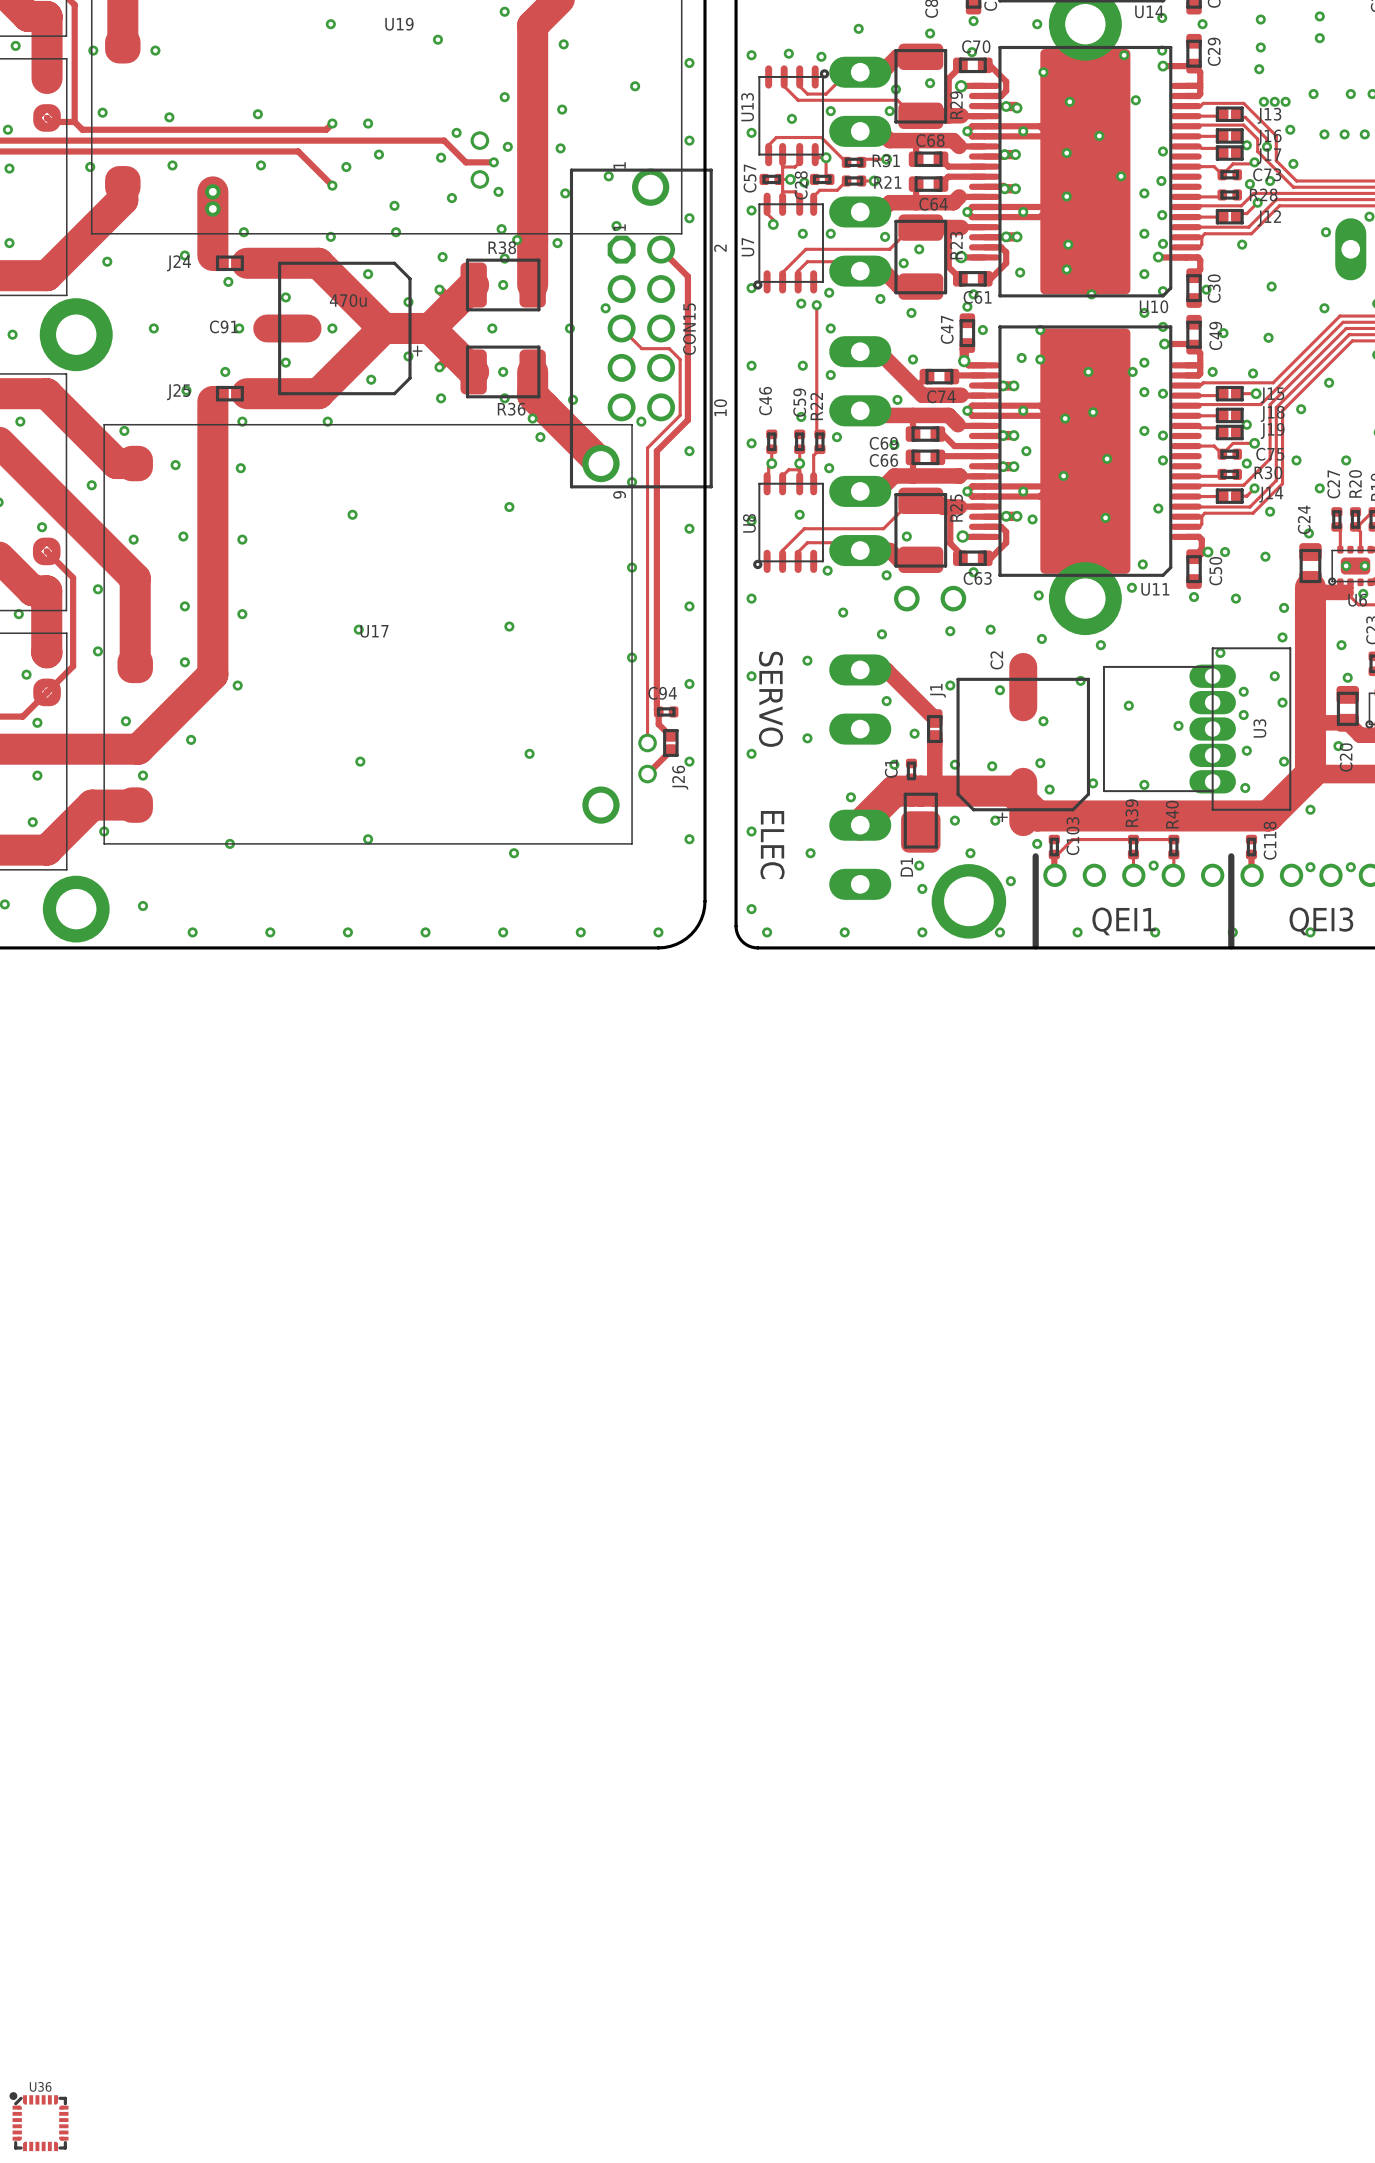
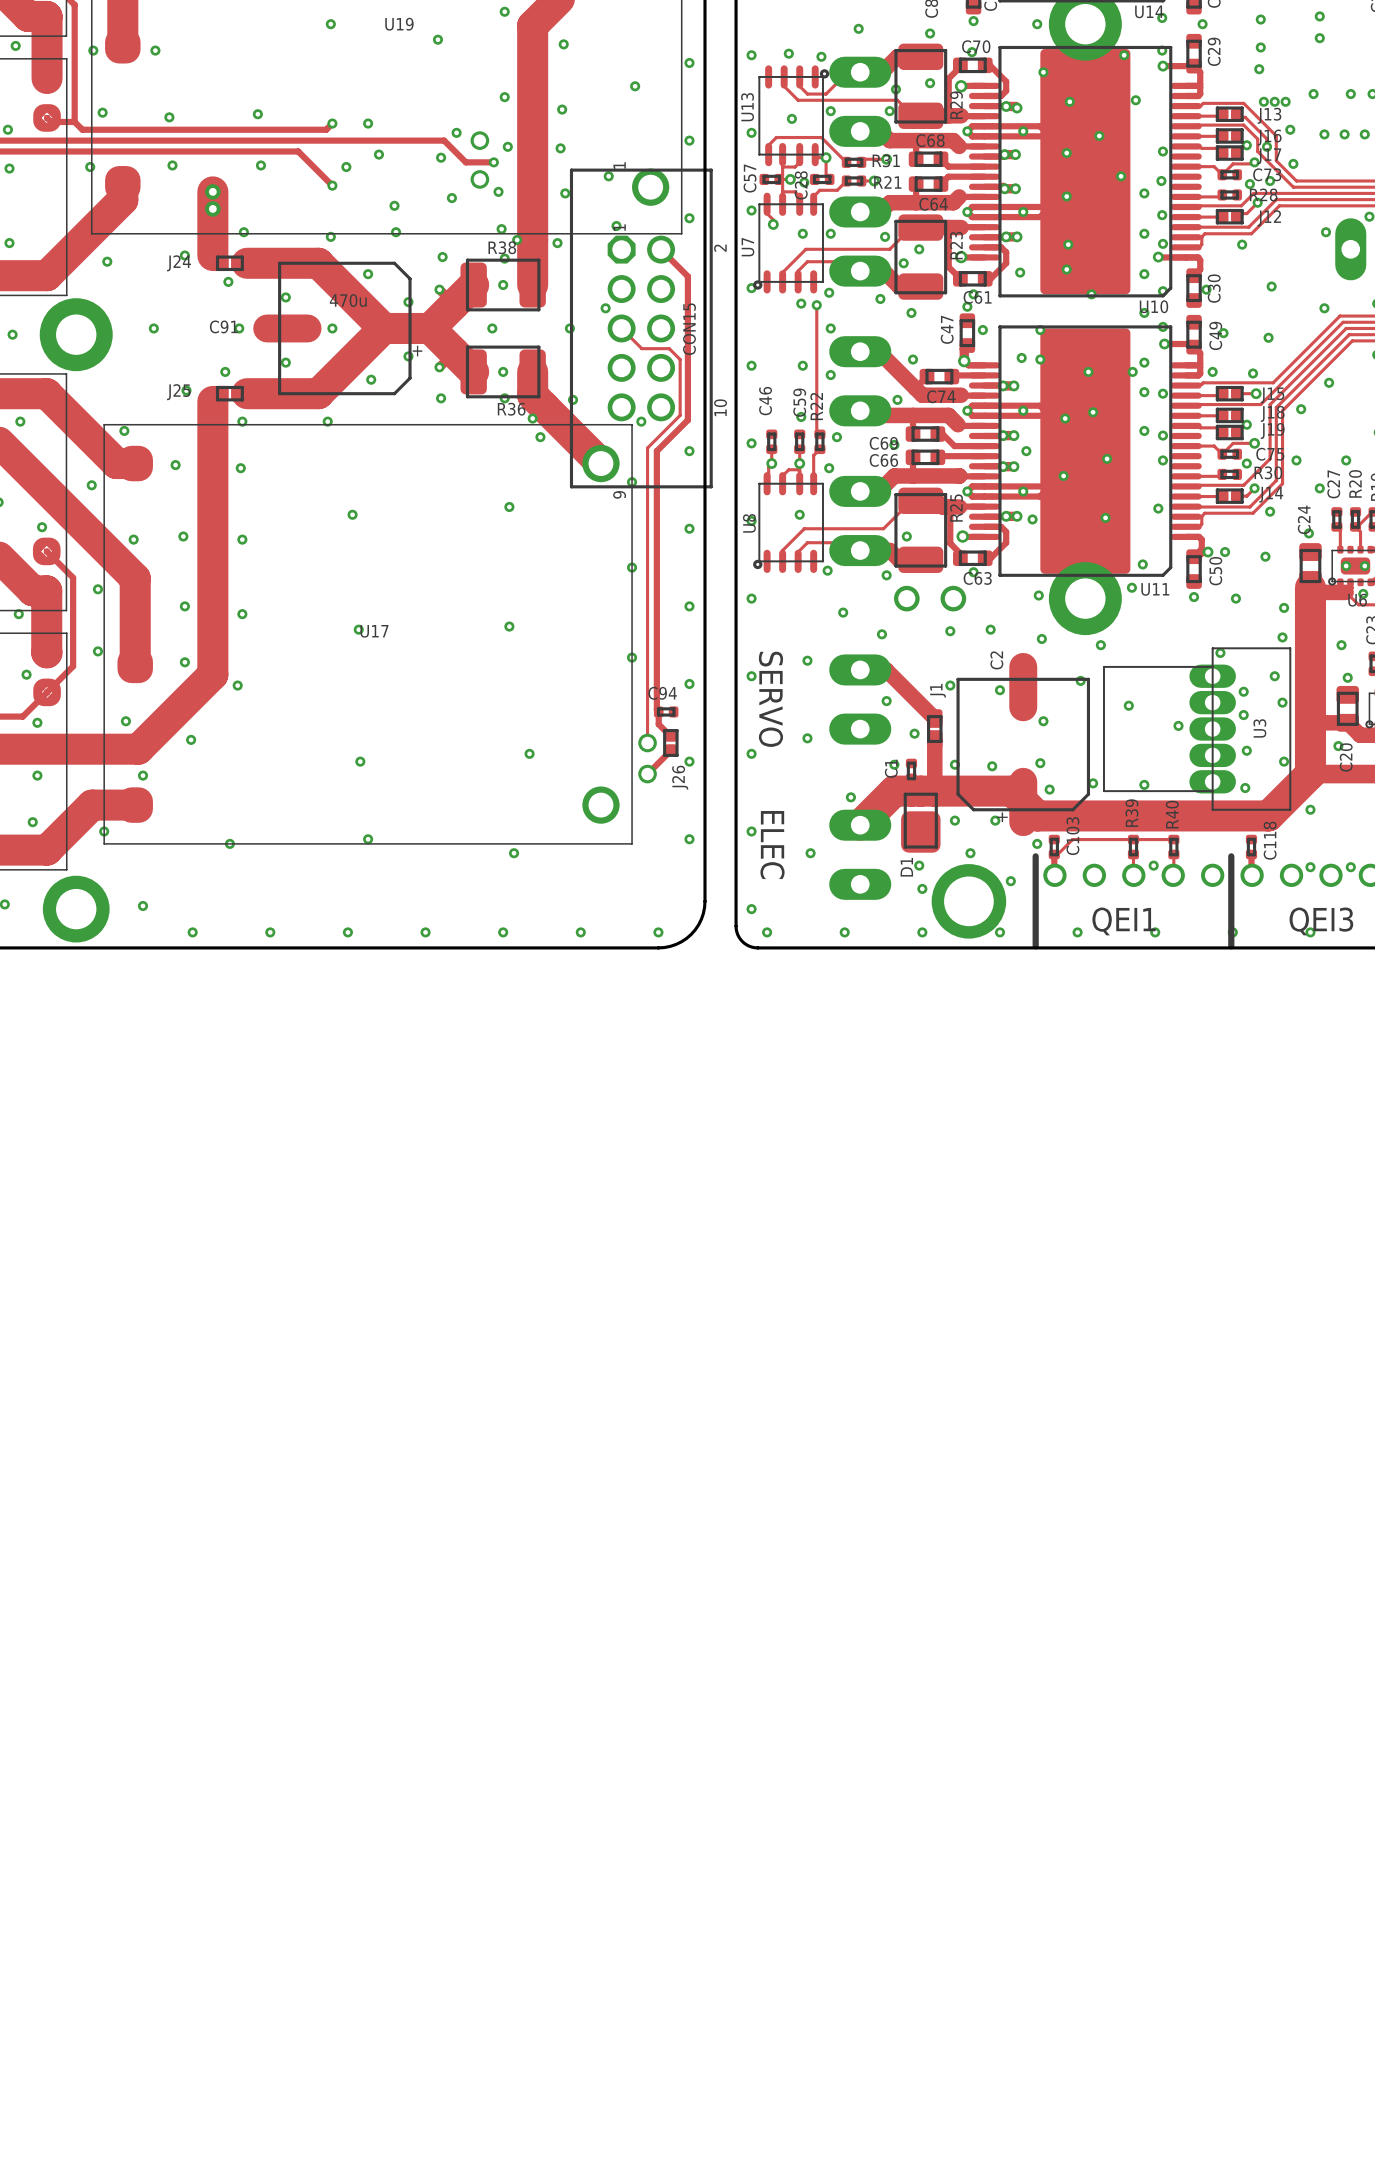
U36: (38, 2121) -> none

